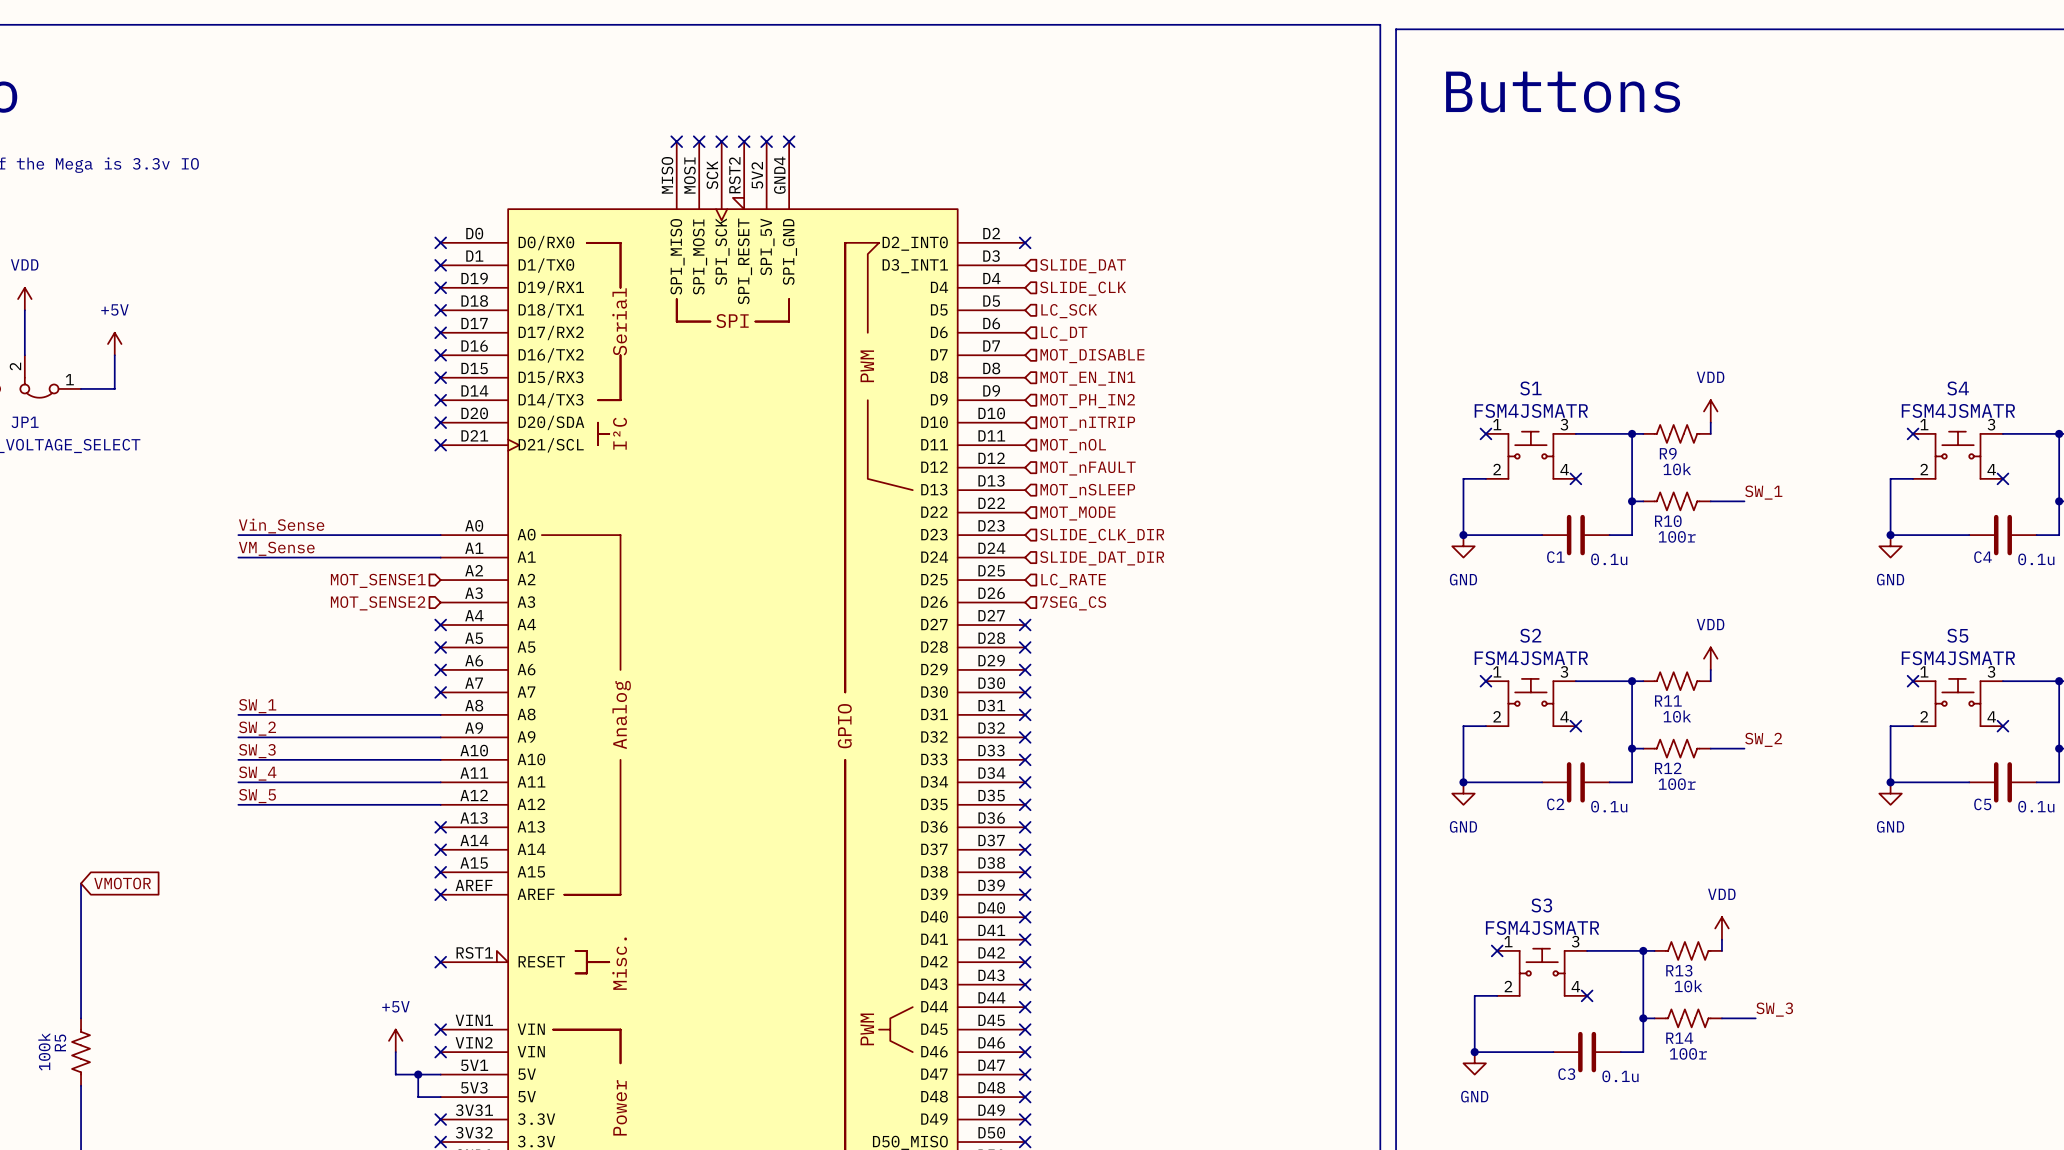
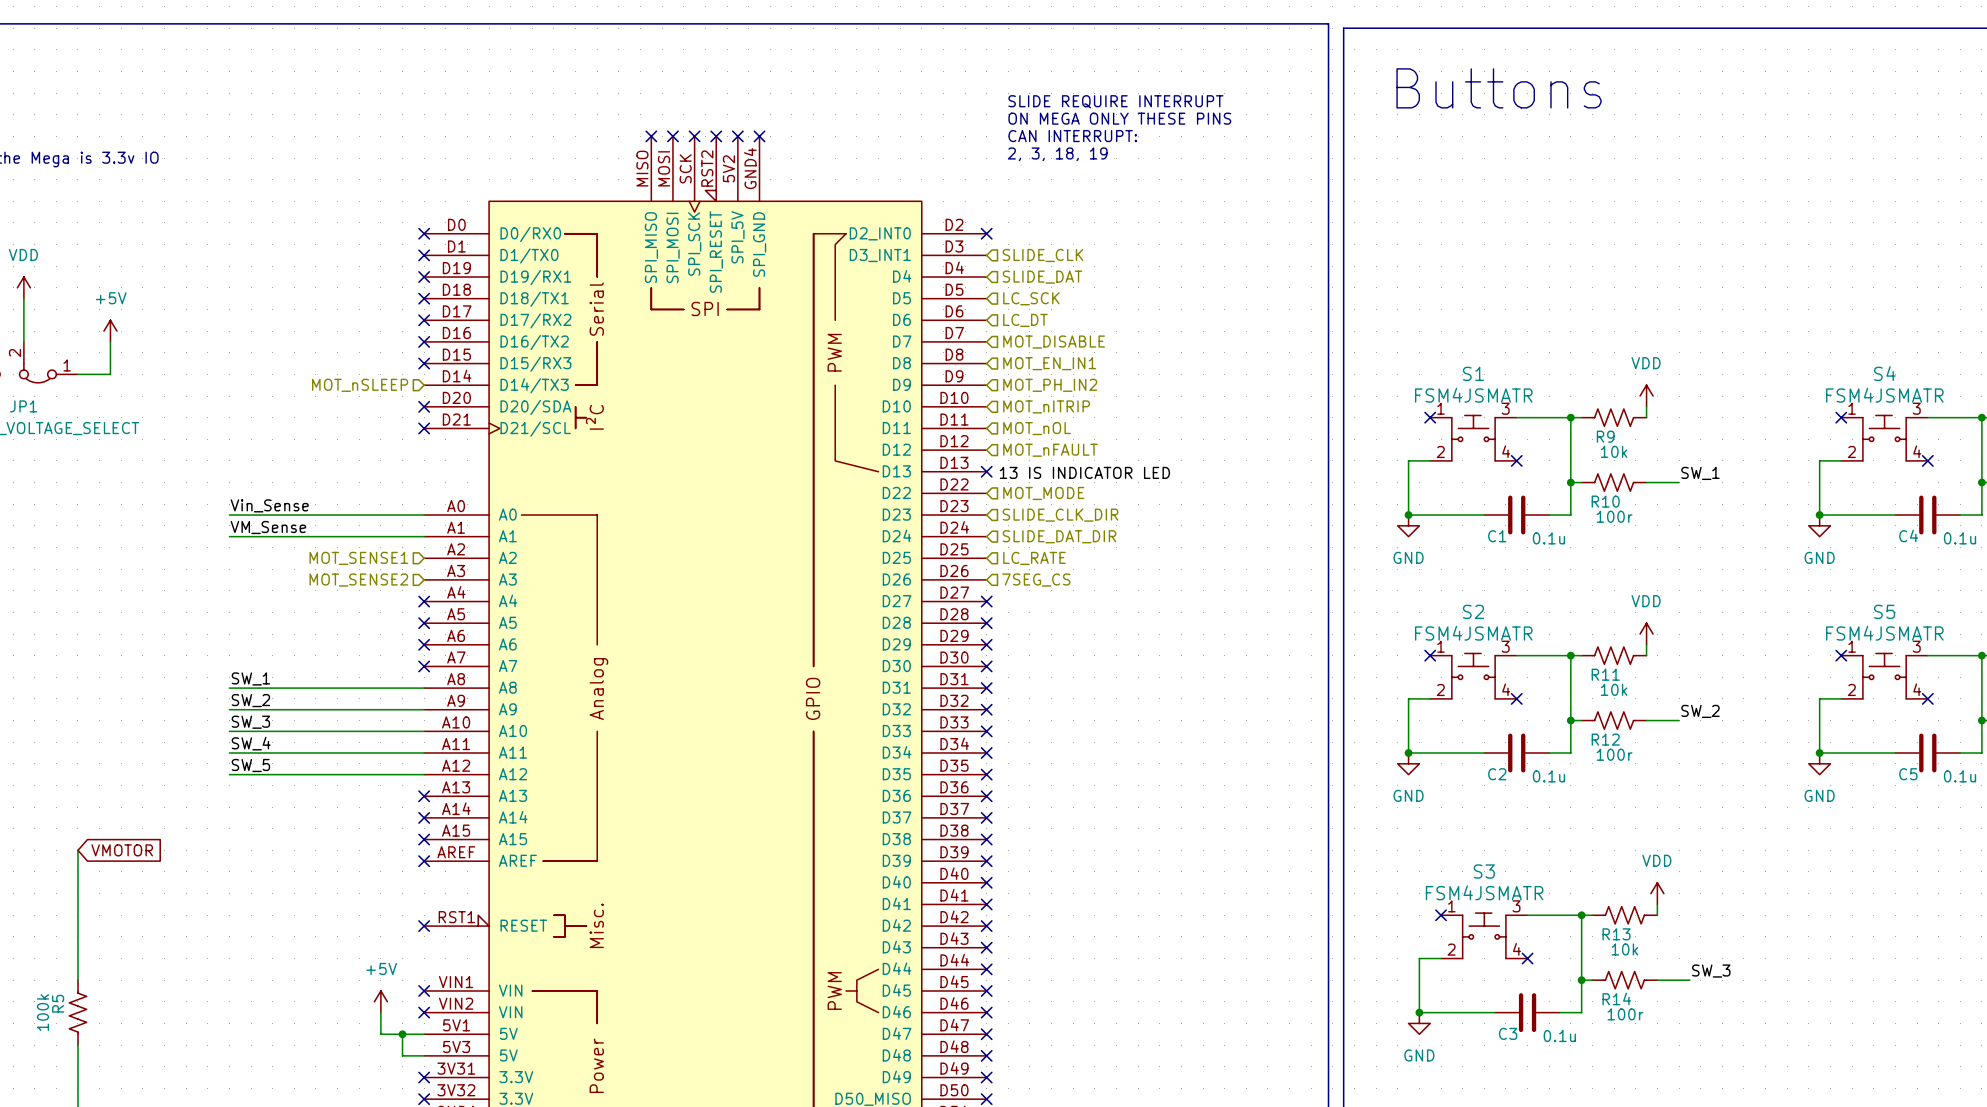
text: none -> SLIDE REQUIRE INTERRUPT (1115, 101)
text: none -> ON MEGA ONLY THESE PINS (1119, 118)
text: none -> CAN INTERRUPT: (1072, 136)
text: none -> 2, 3, 18, 19 (1057, 154)
hierarchical label: SLIDE_DAT (1083, 266) -> SLIDE_CLK (1042, 255)
hierarchical label: SLIDE_CLK (1083, 288) -> SLIDE_DAT (1042, 277)
no-connect mark: (440, 400) -> none
hierarchical label: none -> MOT_nSLEEP (360, 385)
no-connect mark: none -> (986, 471)
hierarchical label: MOT_nSLEEP (1087, 490) -> none
label: none -> 13 IS INDICATOR LED (1084, 472)

